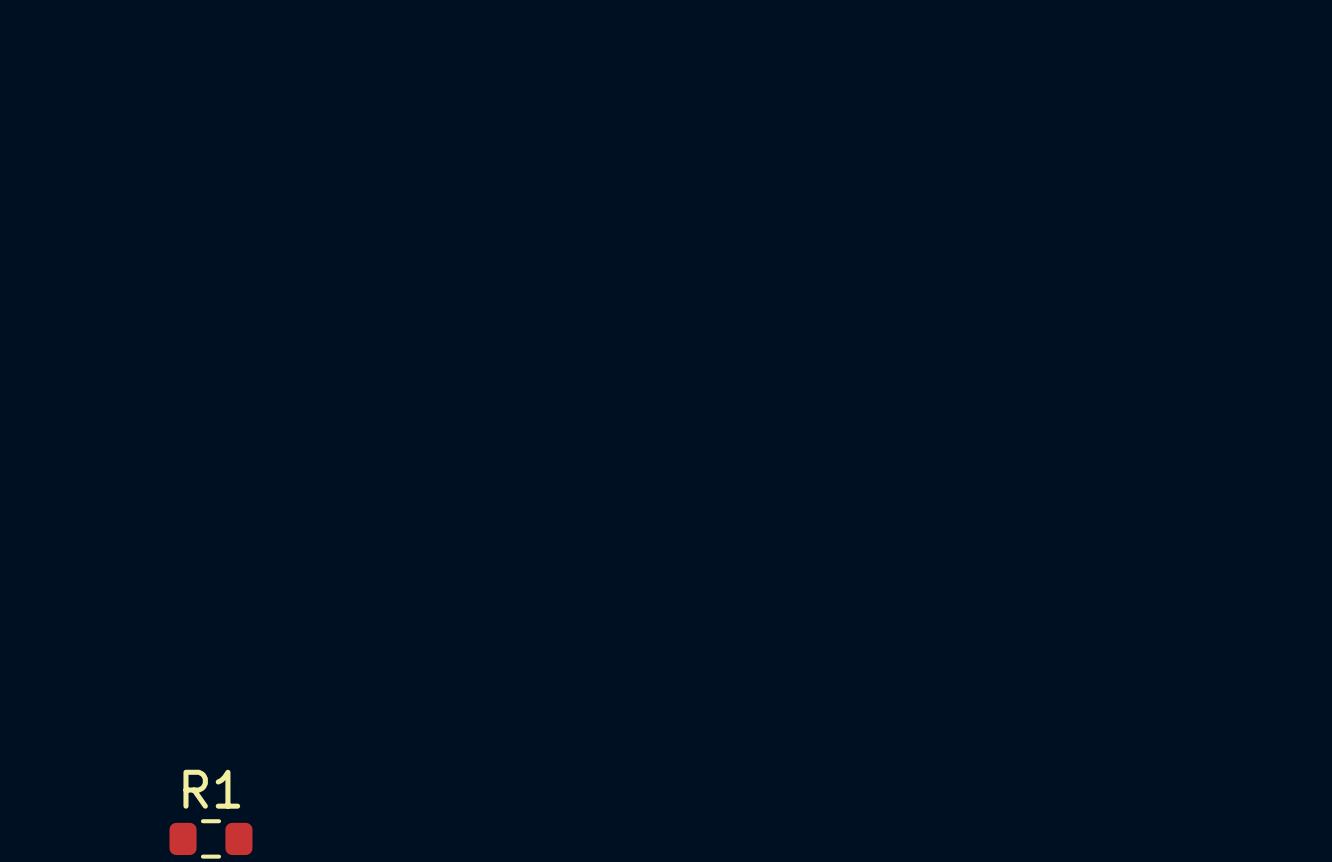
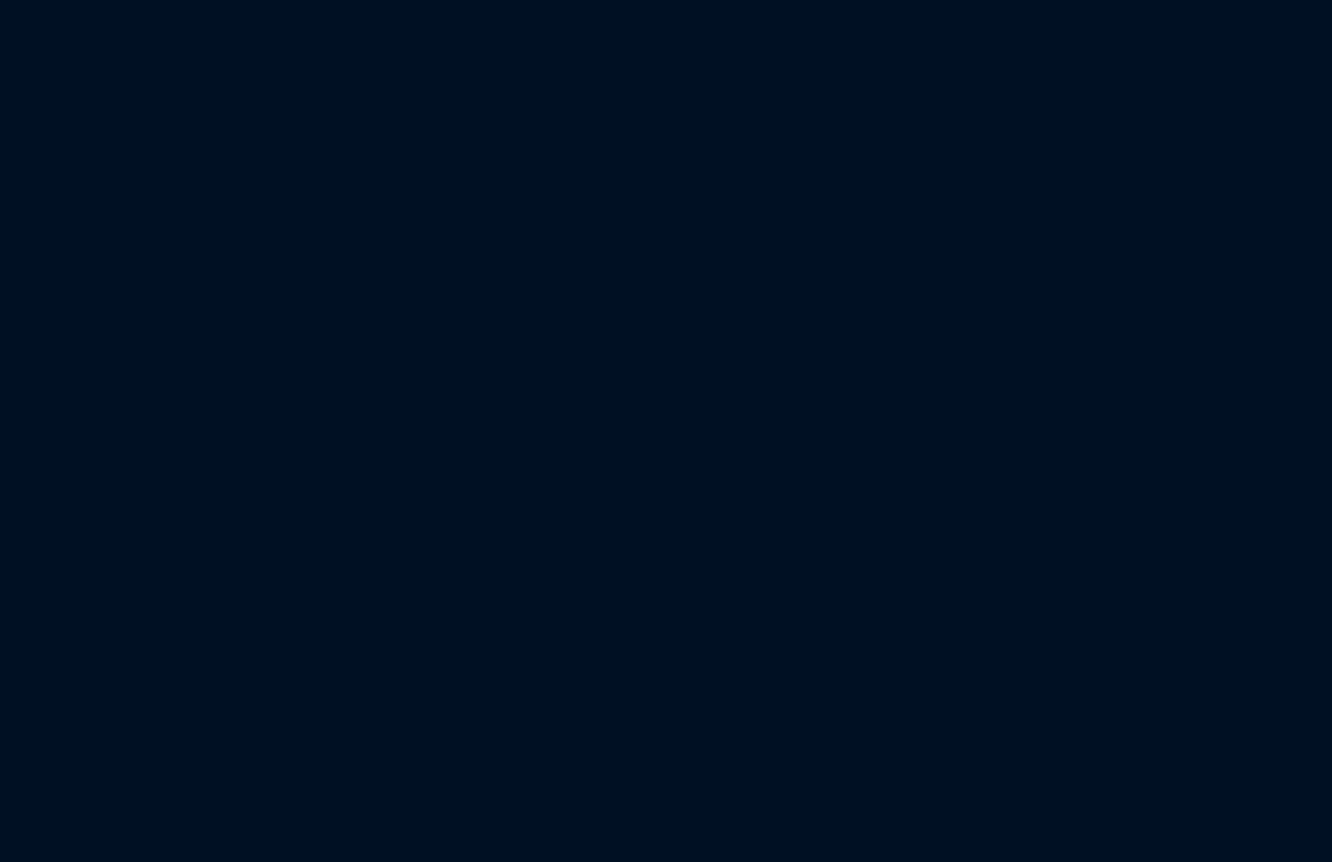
R1: (210, 838) -> none

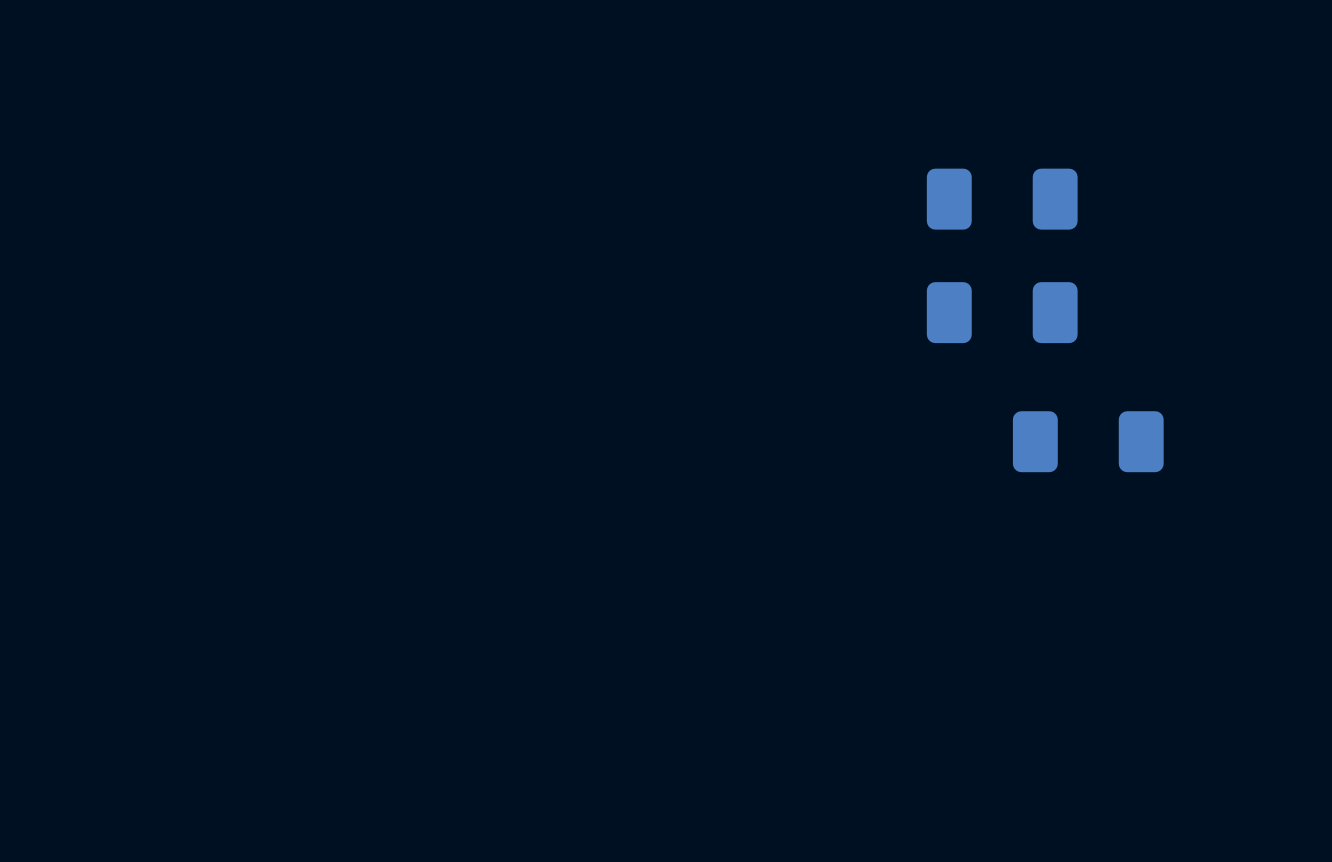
part: none -> (1002, 199)
part: none -> (1002, 312)
part: none -> (1088, 441)

